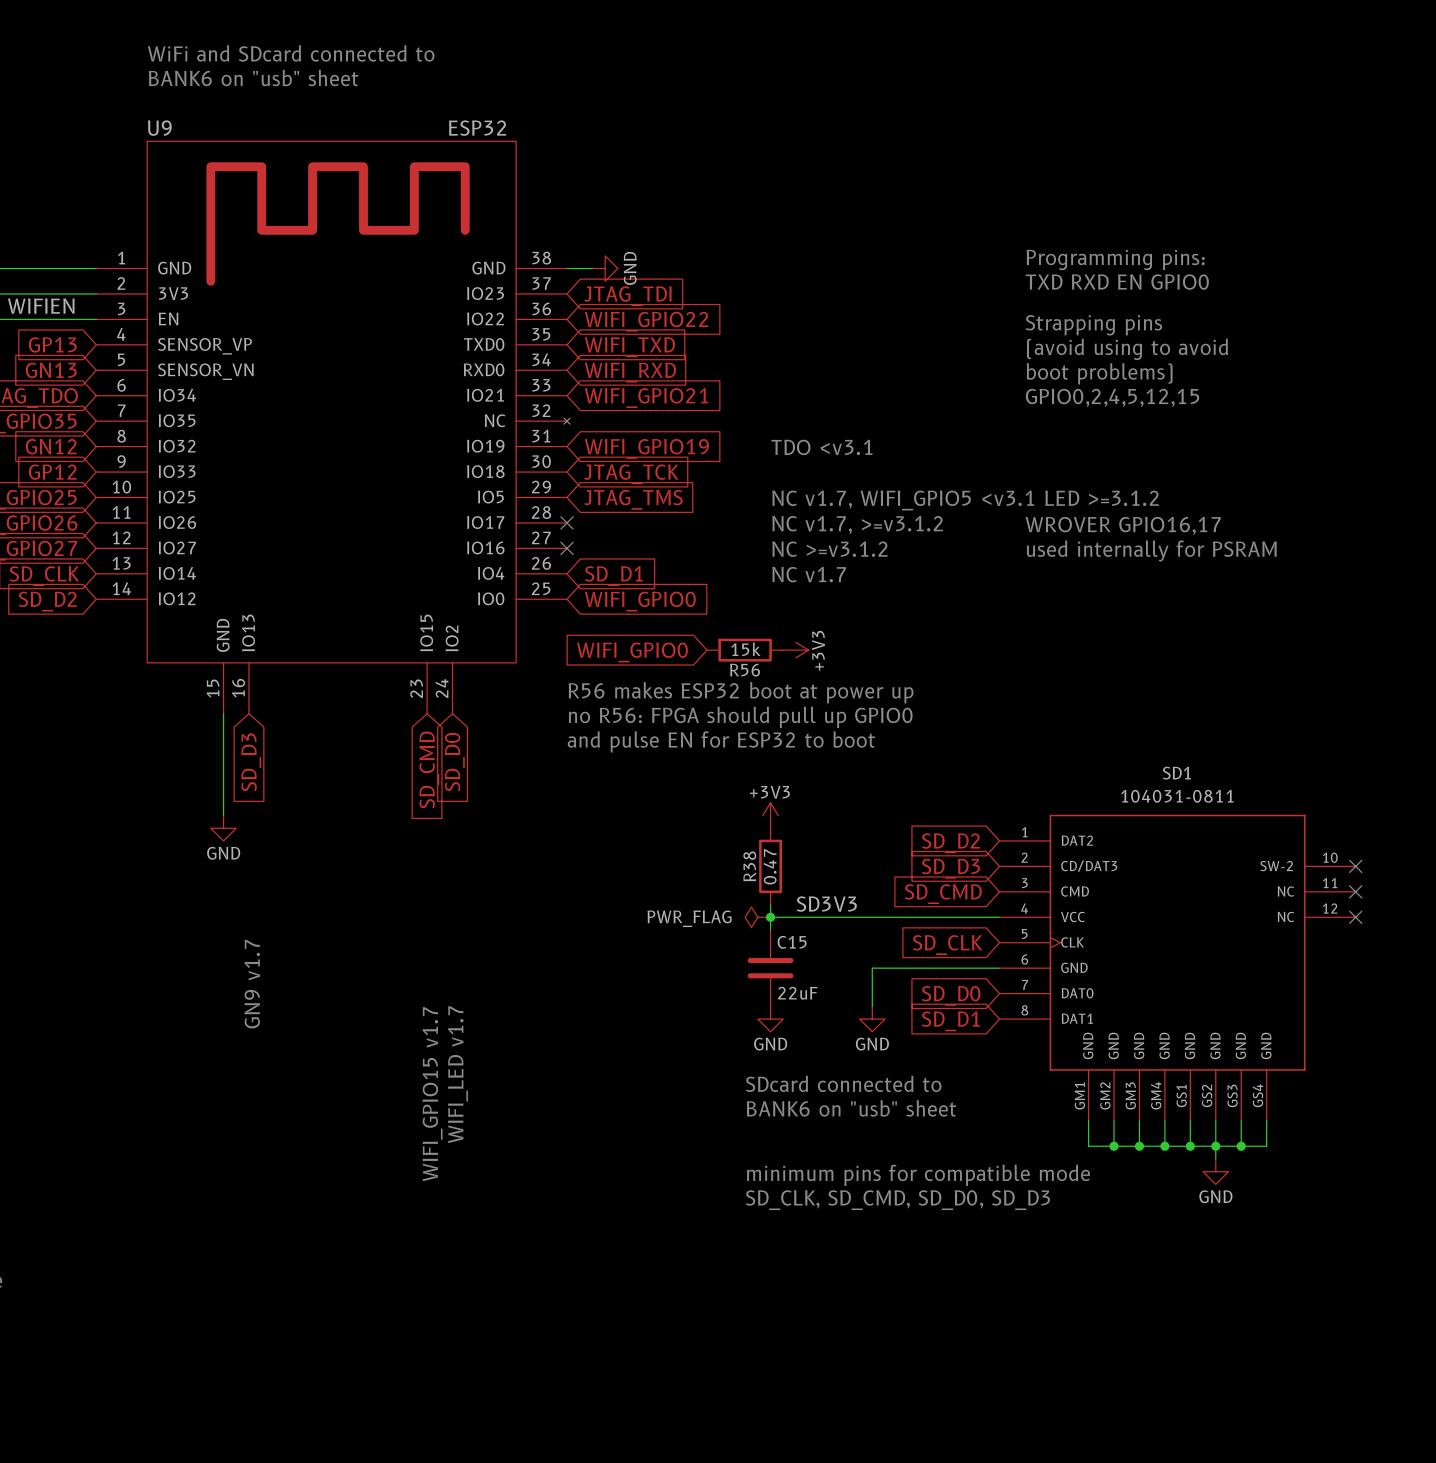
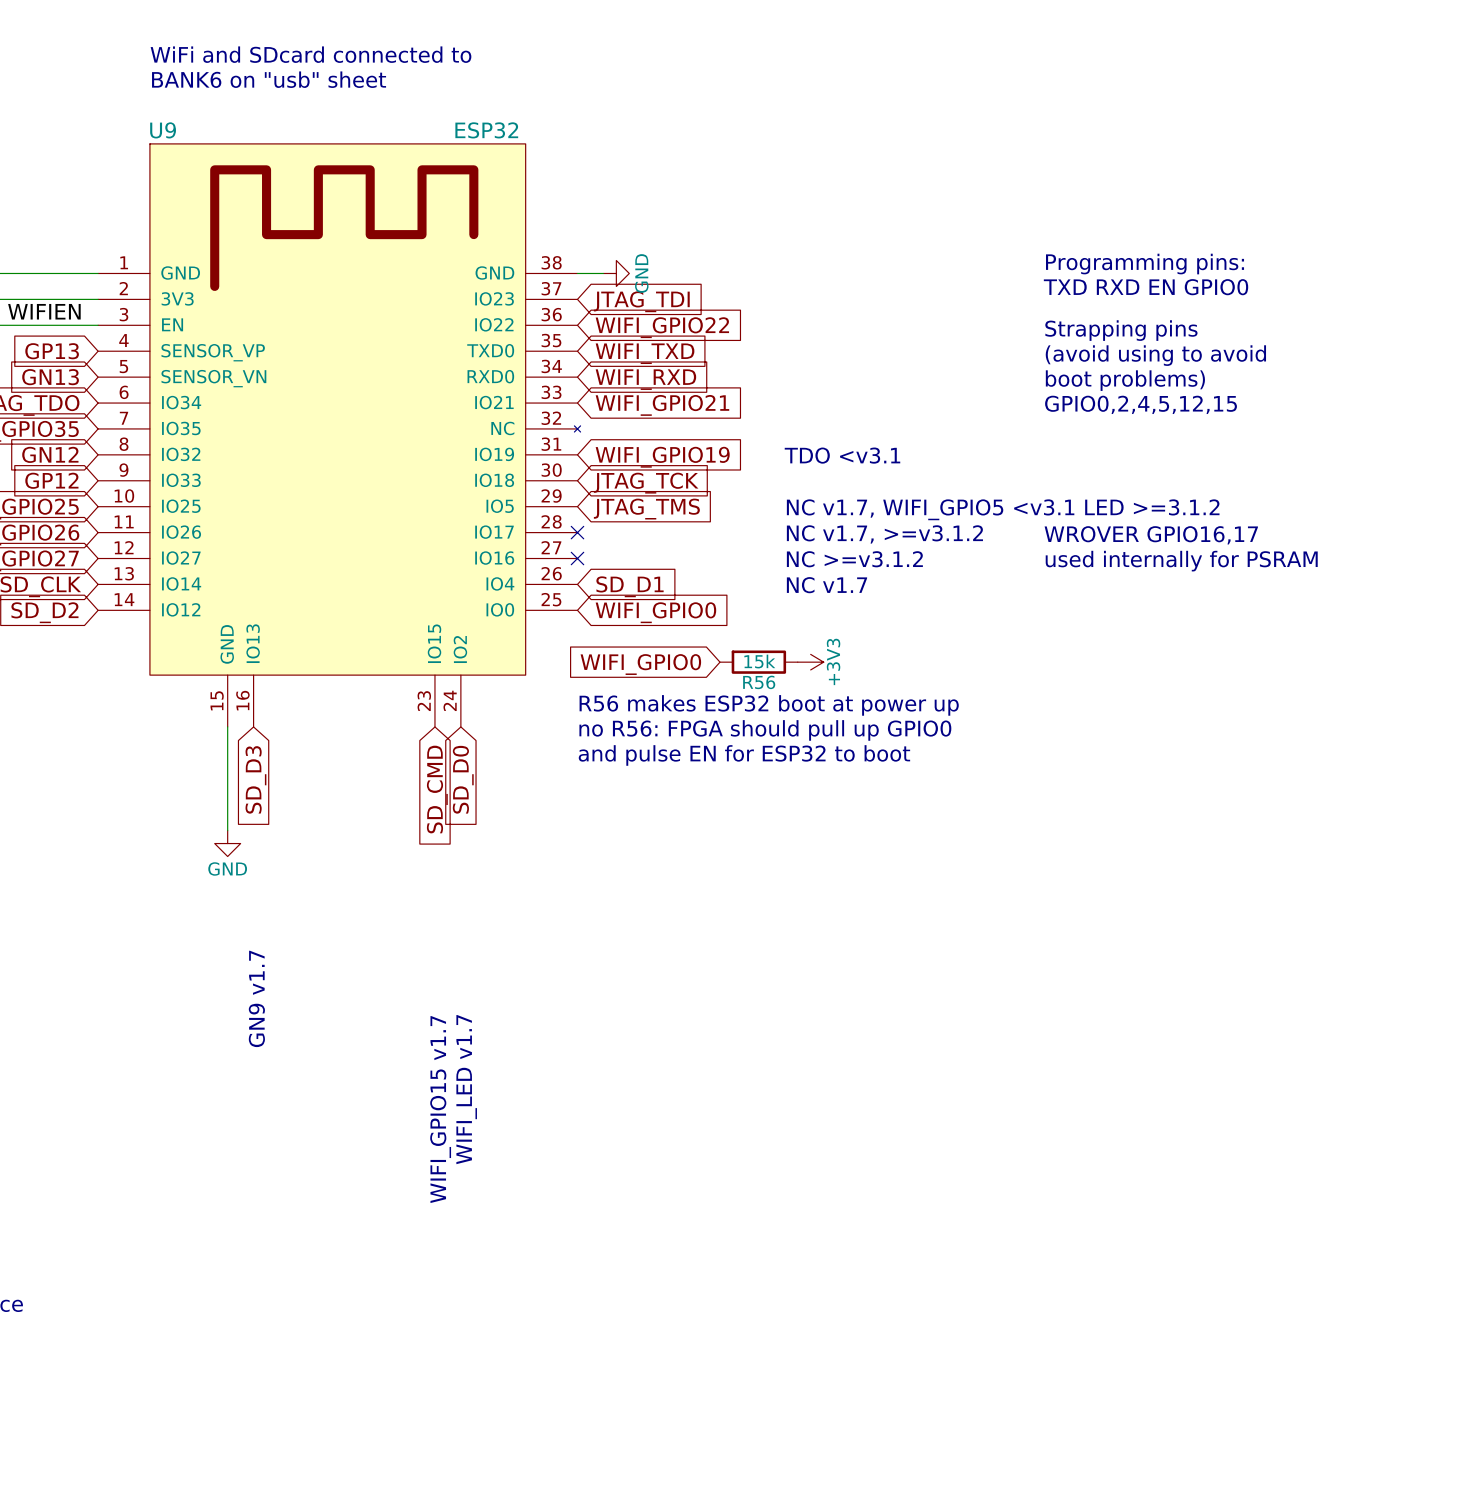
power symbol: +3V3 (770, 815) -> none
global label: SD_D2 (950, 843) -> none
R38: 0.47 (770, 866) -> none
no-connect mark: (1355, 866) -> none
global label: SD_D3 (950, 868) -> none
no-connect mark: (1355, 891) -> none
global label: SD_CMD (943, 894) -> none
wire: (770, 904) (770, 930) -> none
label: SD3V3 (826, 904) -> none
power symbol: PWR_FLAG (757, 917) -> none
wire: (770, 917) (999, 917) -> none
junction: (770, 917) -> none
no-connect mark: (1355, 917) -> none
global label: SD_CLK (947, 945) -> none
SD1: 104031-0811 (1177, 967) -> none
C15: 22uF (770, 968) -> none
wire: (999, 968) (872, 968) (872, 1006) -> none
global label: SD_D0 (951, 995) -> none
power symbol: GND (770, 1019) -> none
power symbol: GND (872, 1019) -> none
global label: SD_D1 (950, 1021) -> none
text: SDcard connected to (843, 1083) -> none
text: BANK6 on "usb" sheet (851, 1108) -> none
wire: (1088, 1120) (1088, 1146) (1266, 1146) (1266, 1120) -> none
wire: (1114, 1120) (1114, 1146) -> none
wire: (1139, 1120) (1139, 1146) -> none
wire: (1164, 1120) (1164, 1146) -> none
wire: (1190, 1120) (1190, 1146) -> none
wire: (1215, 1120) (1215, 1158) -> none
wire: (1241, 1120) (1241, 1146) -> none
junction: (1114, 1146) -> none
junction: (1139, 1146) -> none
junction: (1164, 1146) -> none
junction: (1190, 1146) -> none
junction: (1215, 1146) -> none
junction: (1241, 1146) -> none
power symbol: GND (1215, 1171) -> none
text: minimum pins for compatible mode (918, 1175) -> none
text: SD_CLK, SD_CMD, SD_D0, SD_D3 (897, 1200) -> none

